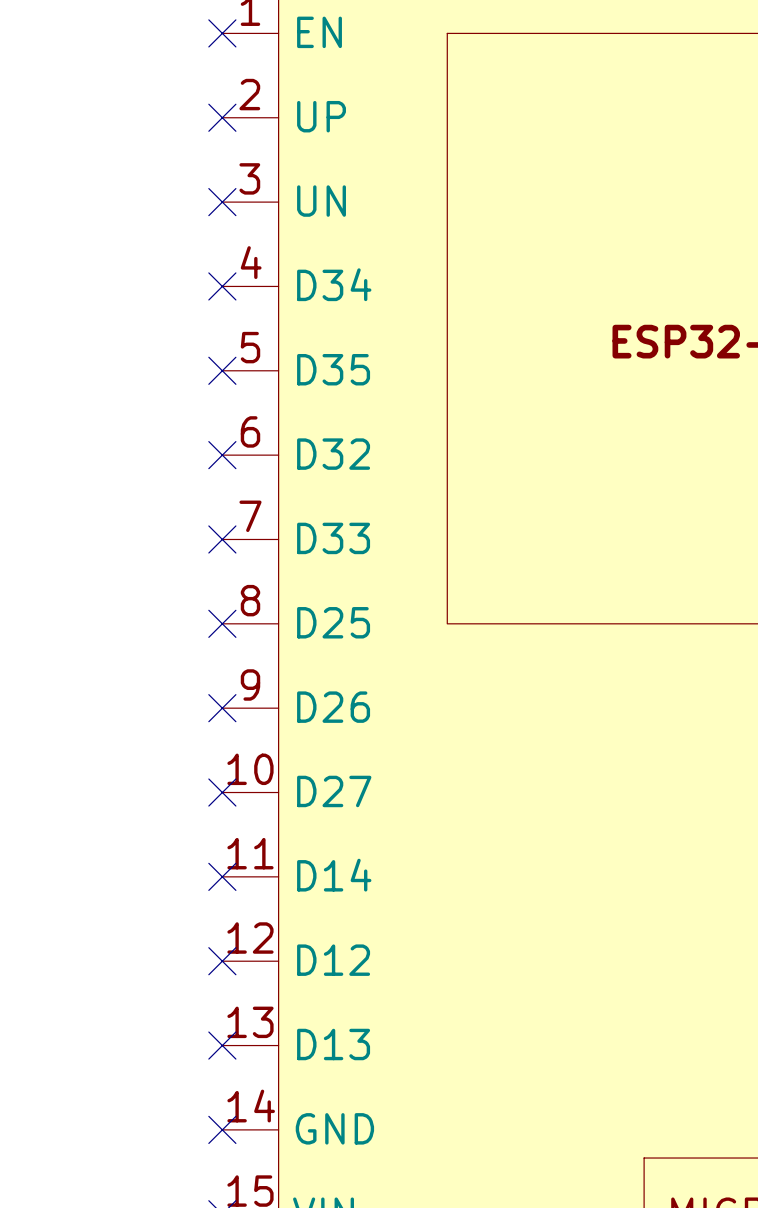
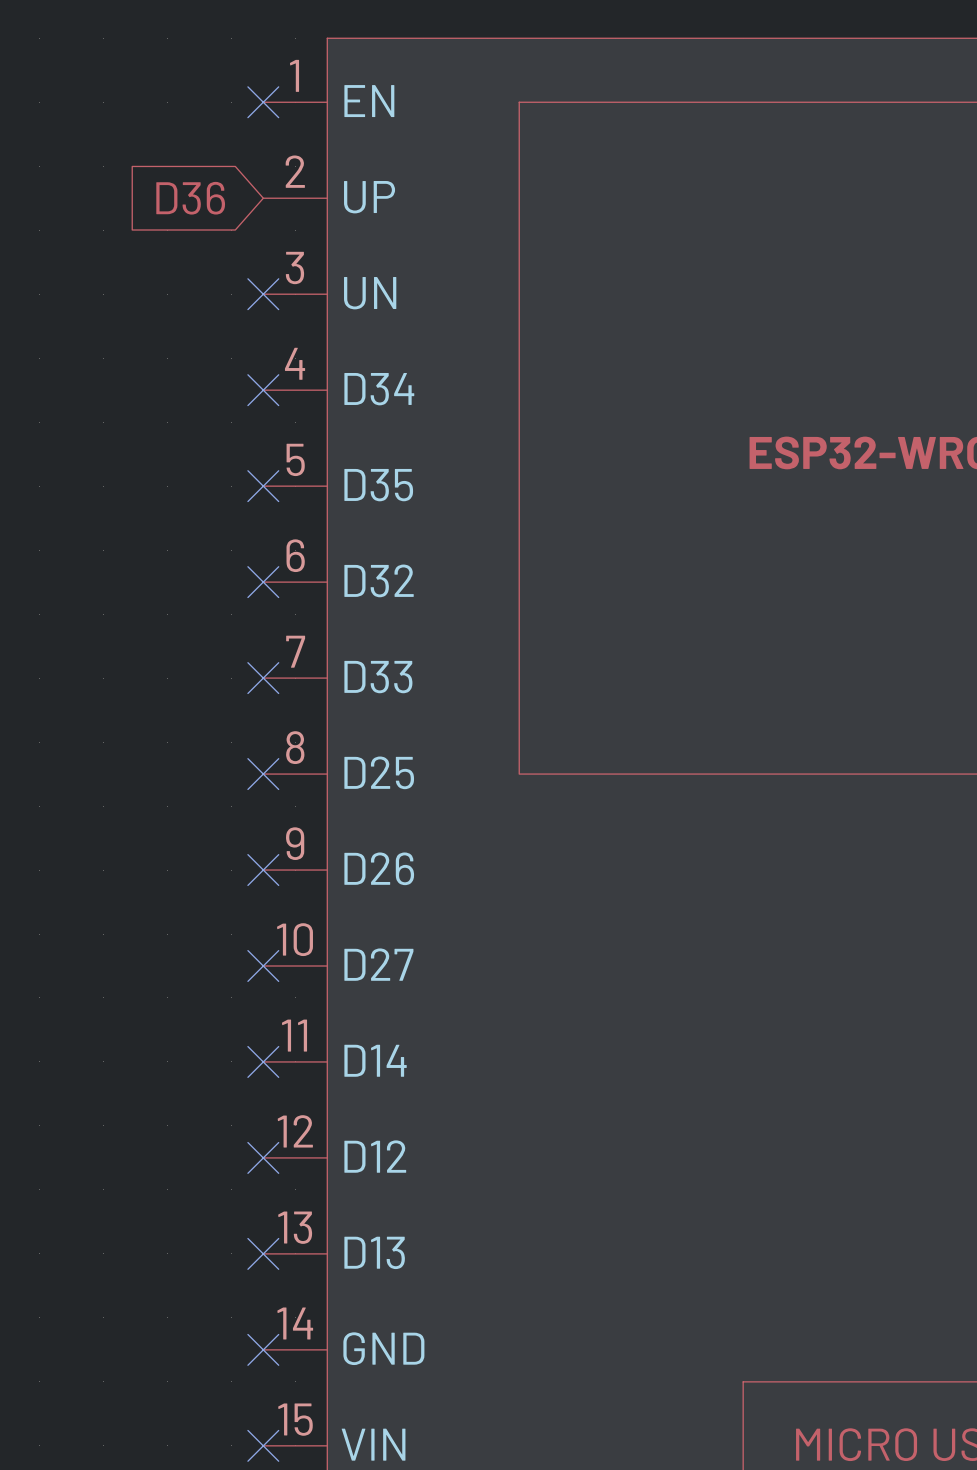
global label: none -> D36 (190, 198)
no-connect mark: (222, 117) -> none

